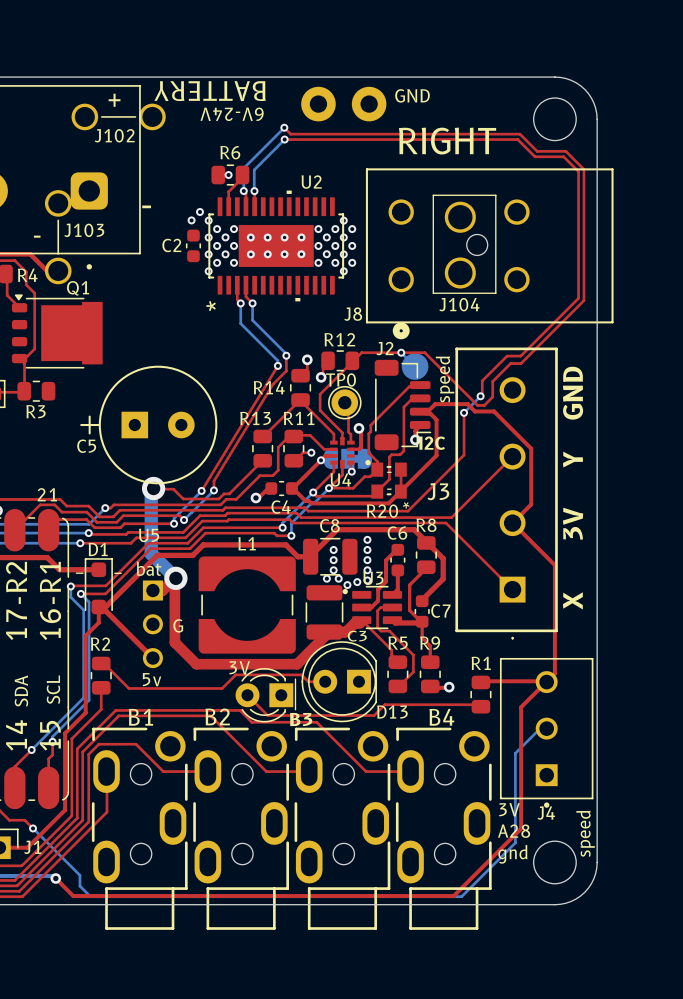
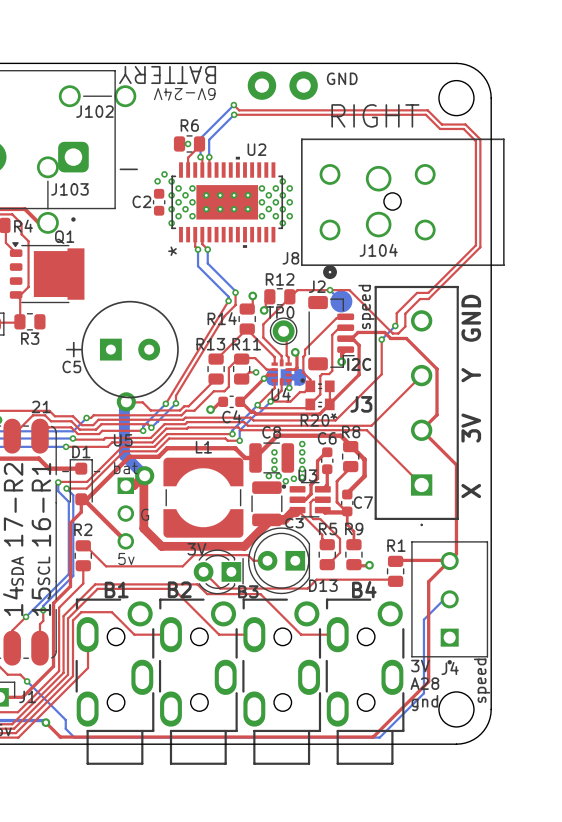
text: + (114, 100) -> none
line: (433, 195) (495, 195) (495, 293) (433, 293) (433, 195) -> none
text: - (37, 236) -> none

